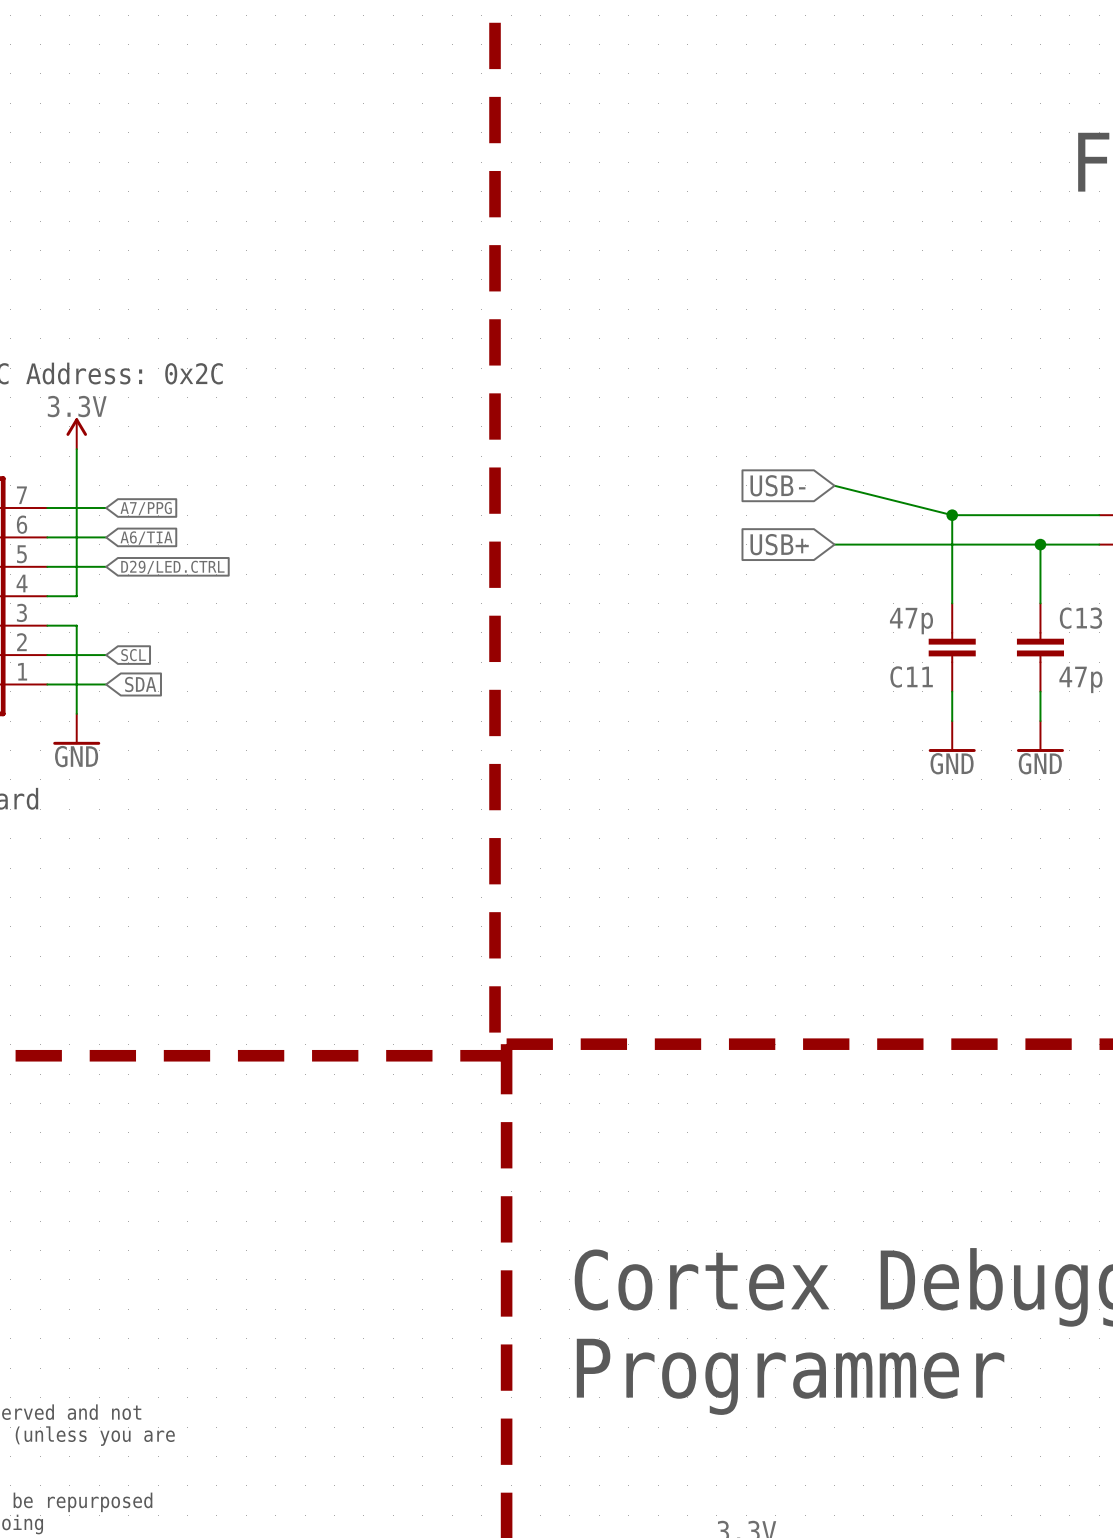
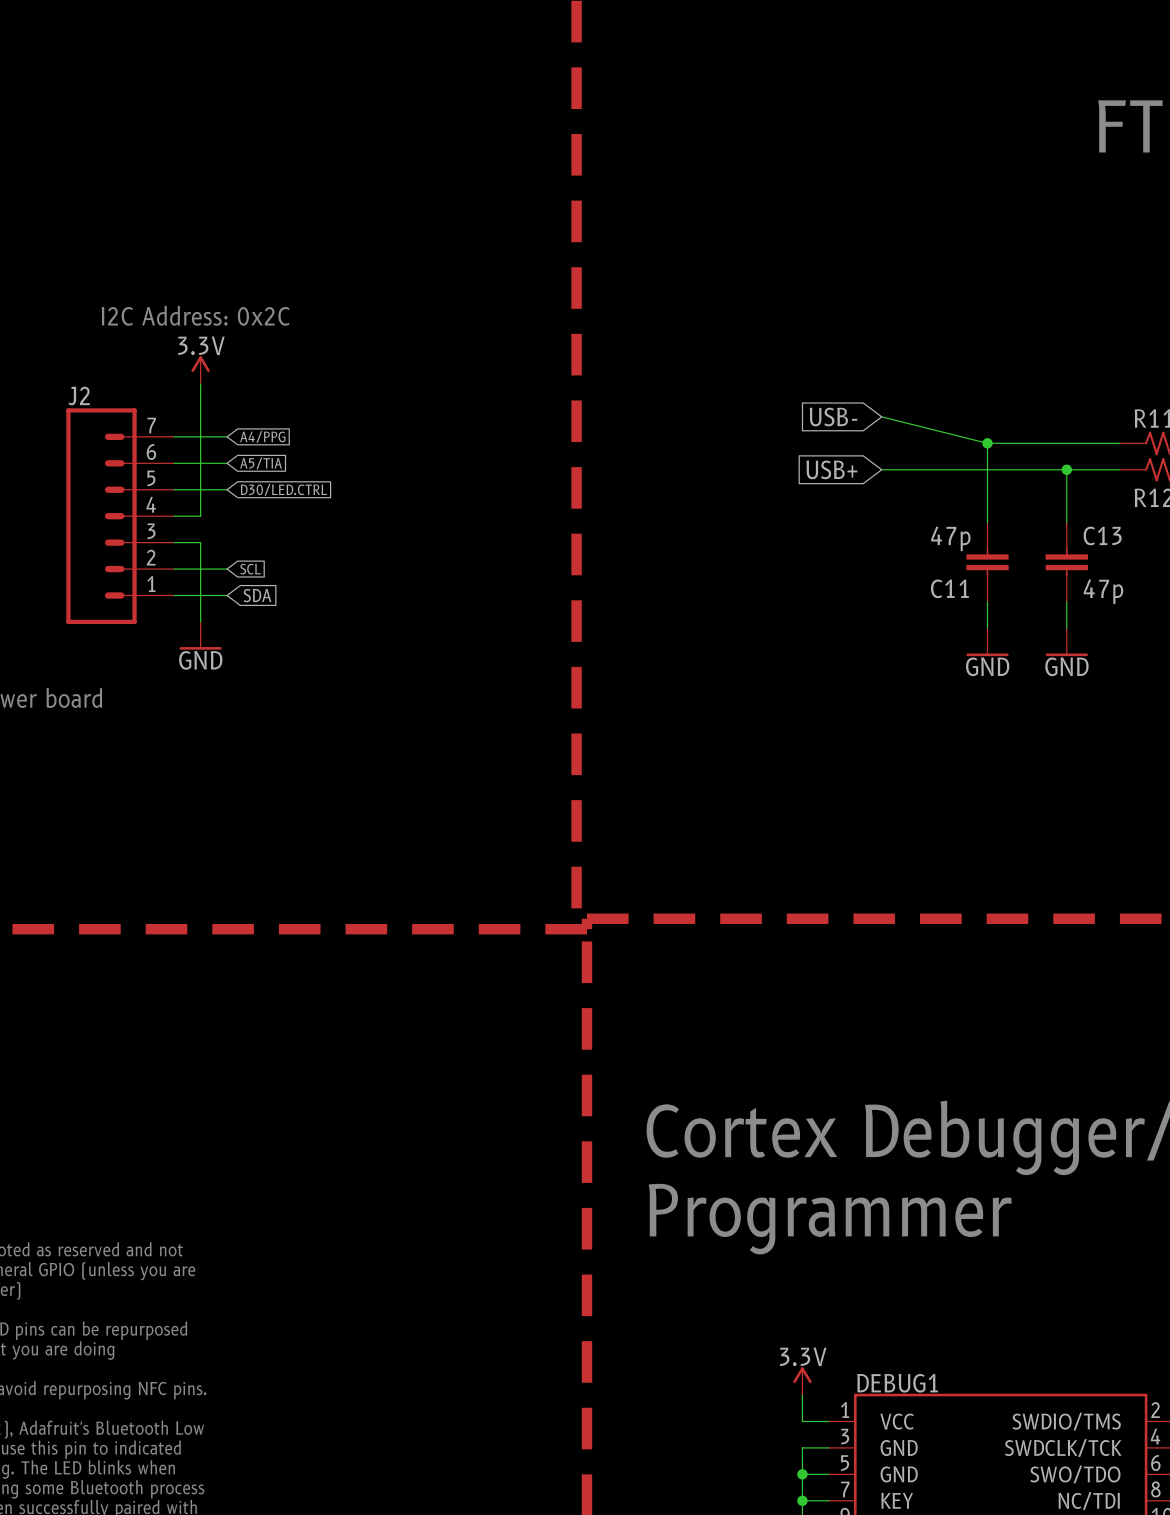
global label: A7/PPG (146, 508) -> A4/PPG (262, 436)
global label: A6/TIA (146, 538) -> A5/TIA (261, 463)
global label: D29/LED.CTRL (172, 567) -> D30/LED.CTRL (283, 489)

